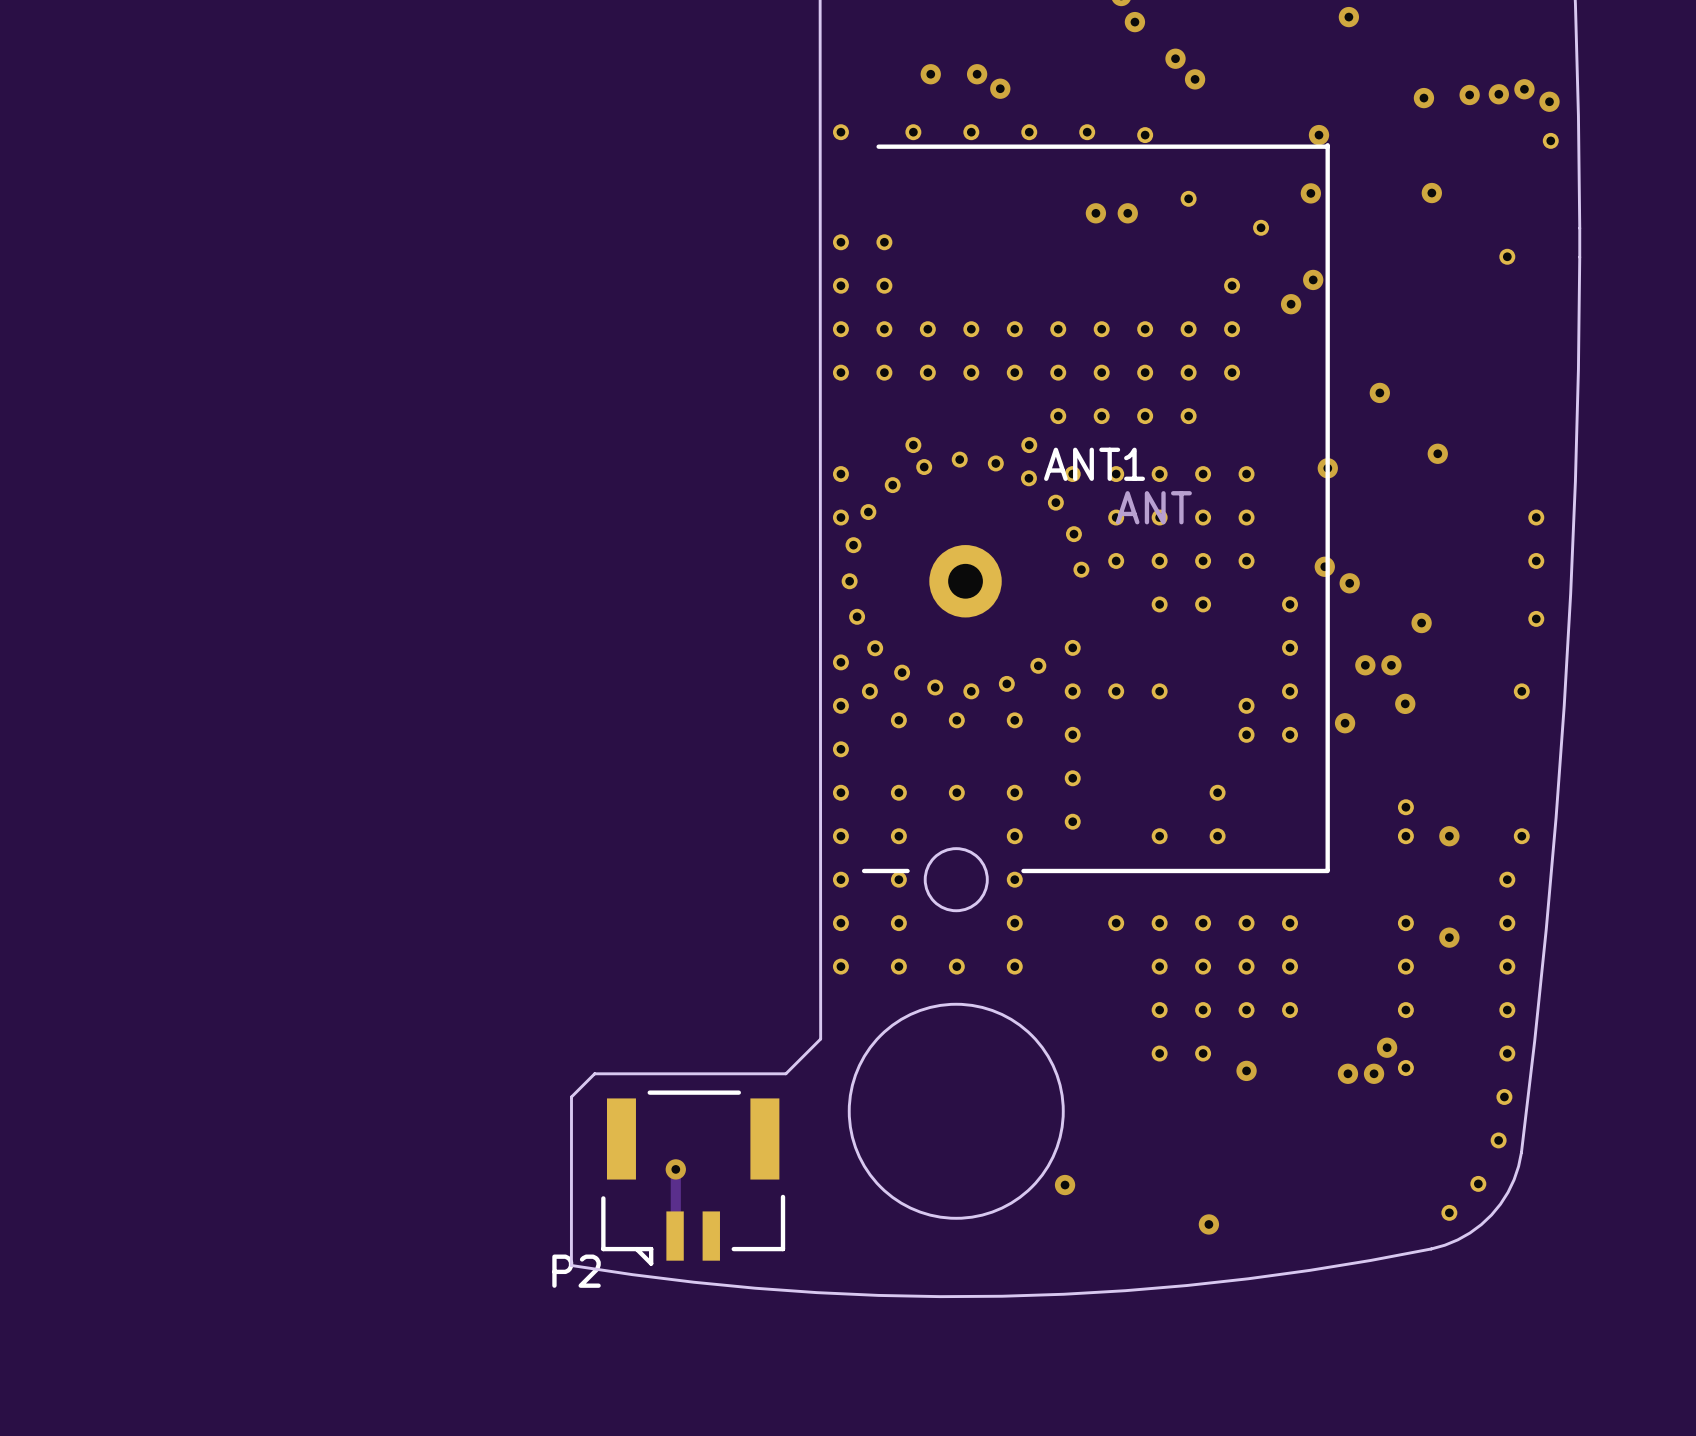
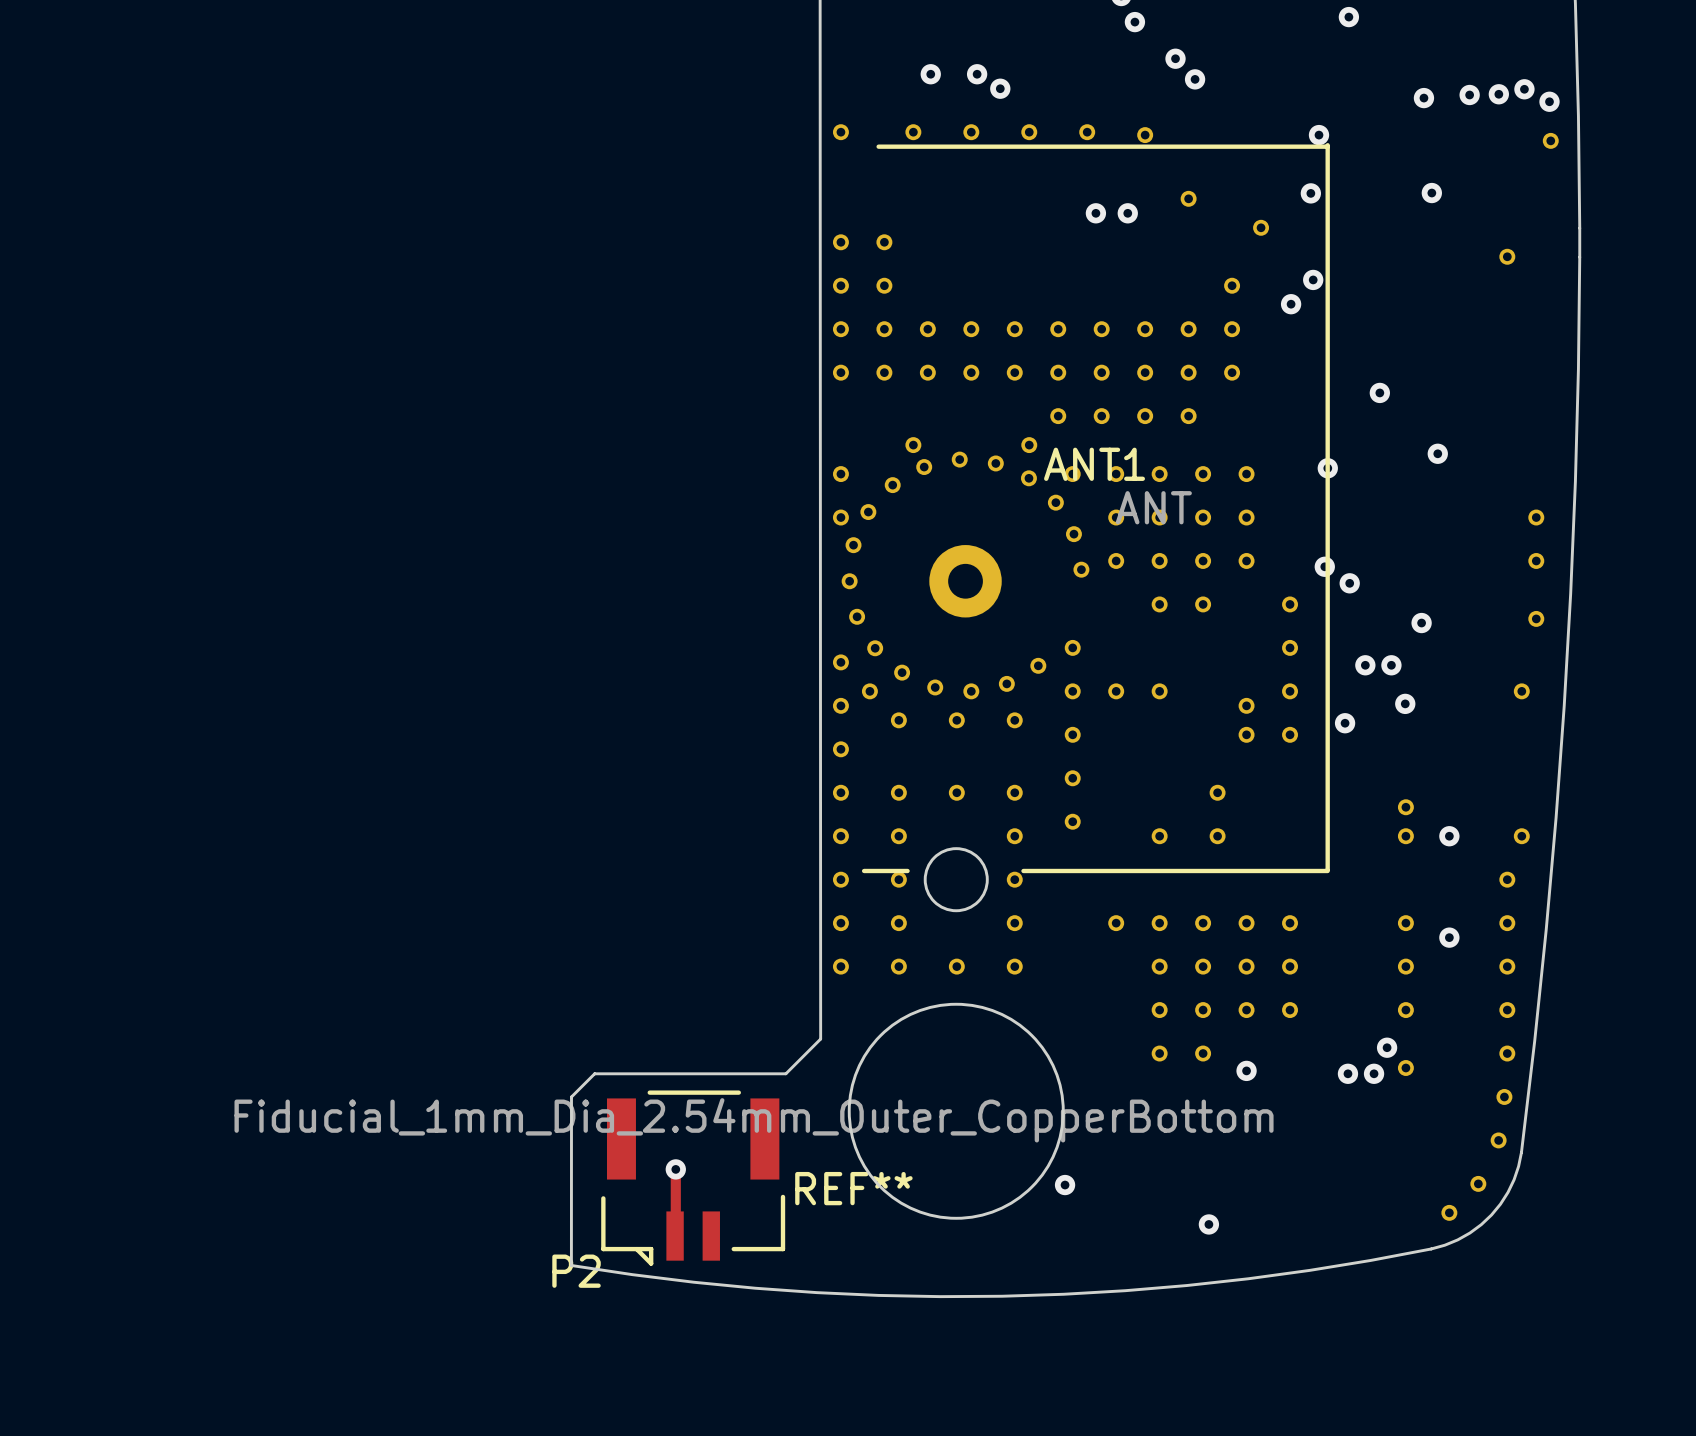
REF**: none -> Fiducial_1mm_Dia_2.54mm_Outer_CopperBottom (754, 1151)

